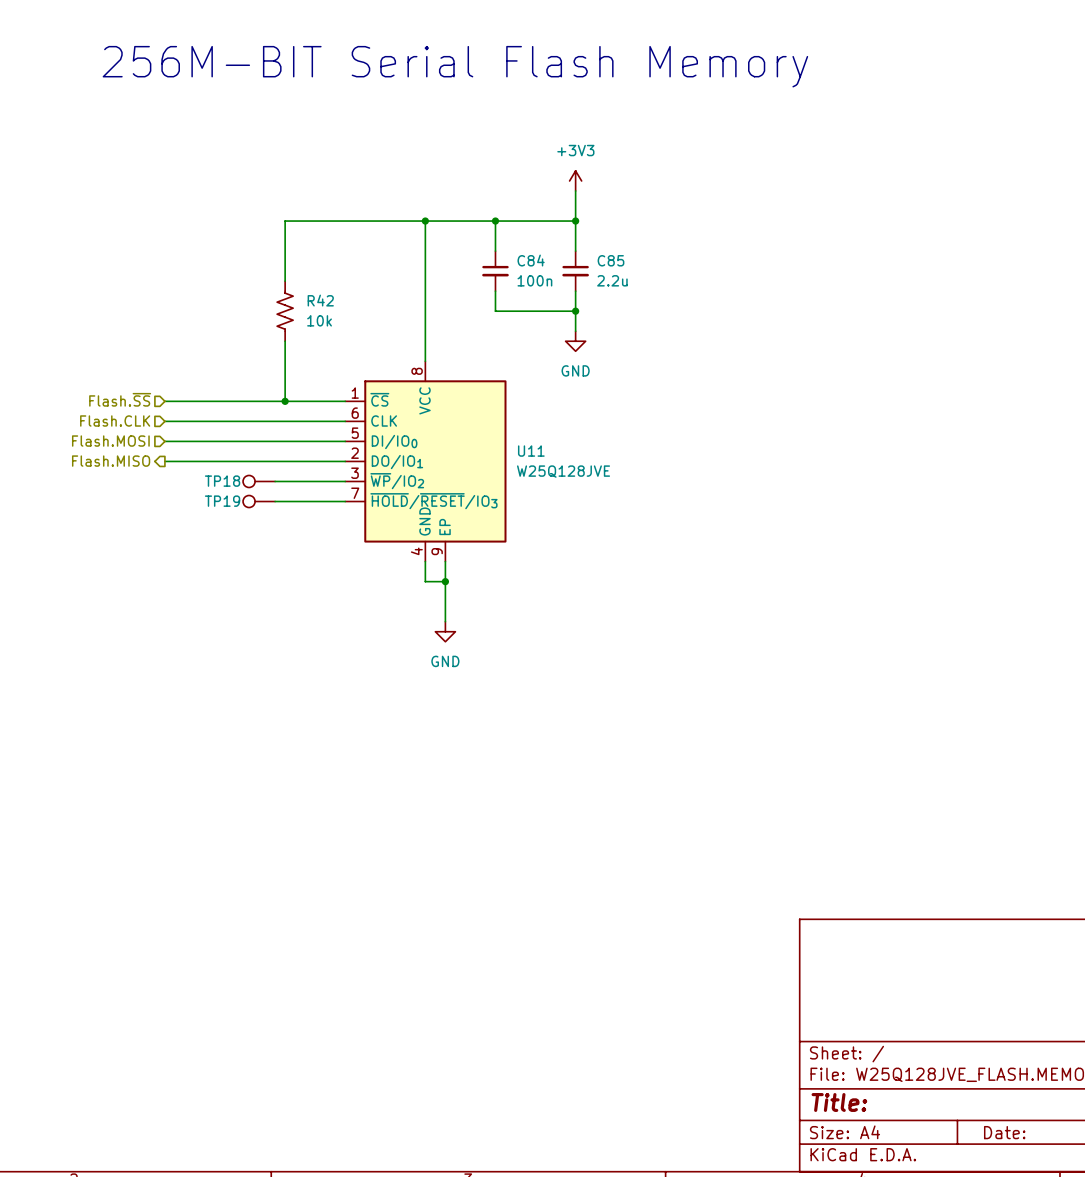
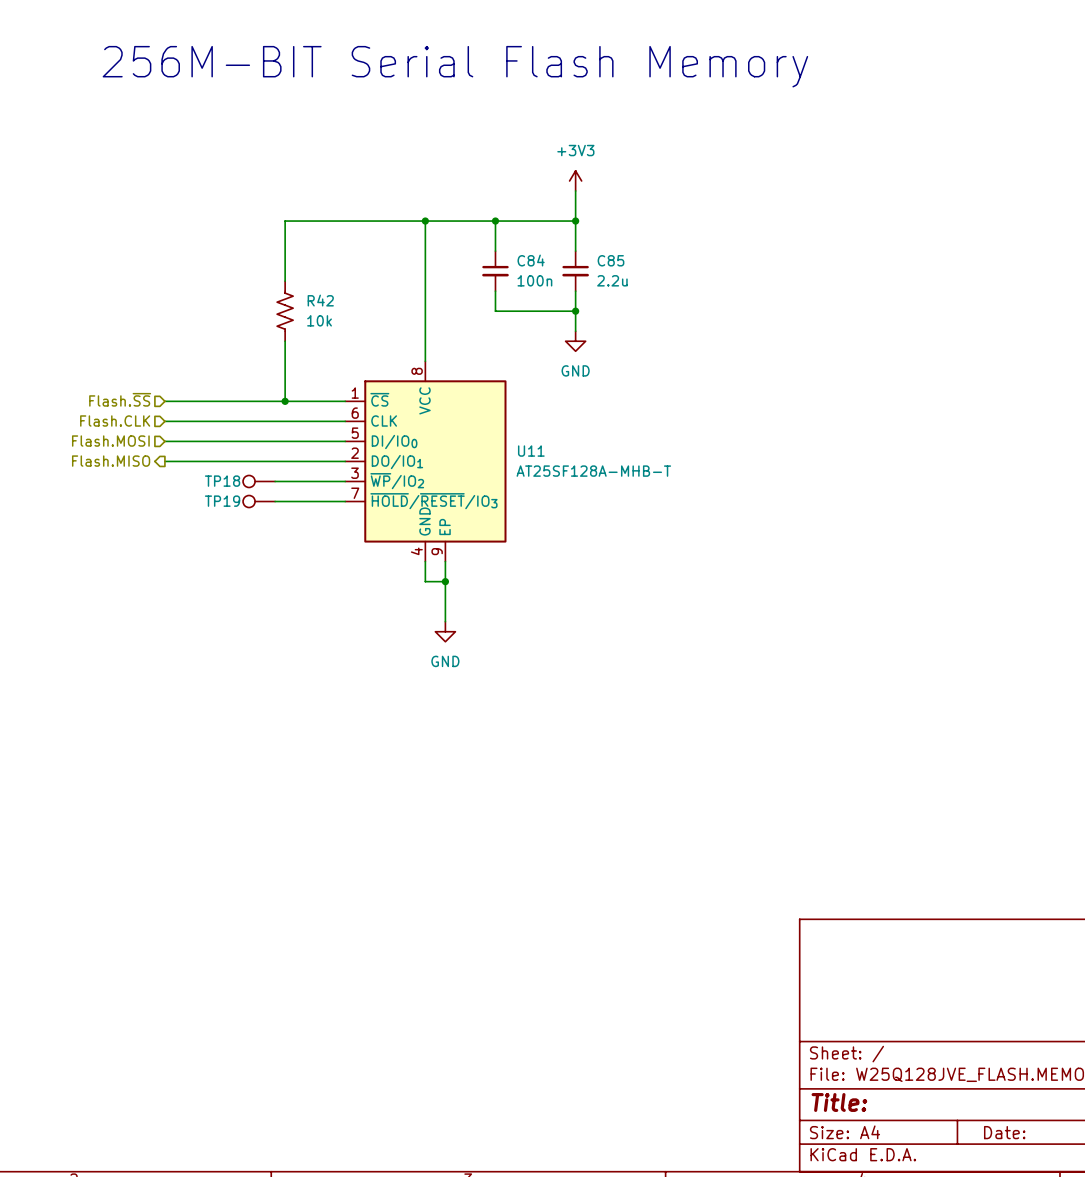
U11 value: W25Q128JVE (563, 471) -> AT25SF128A-MHB-T (593, 471)

